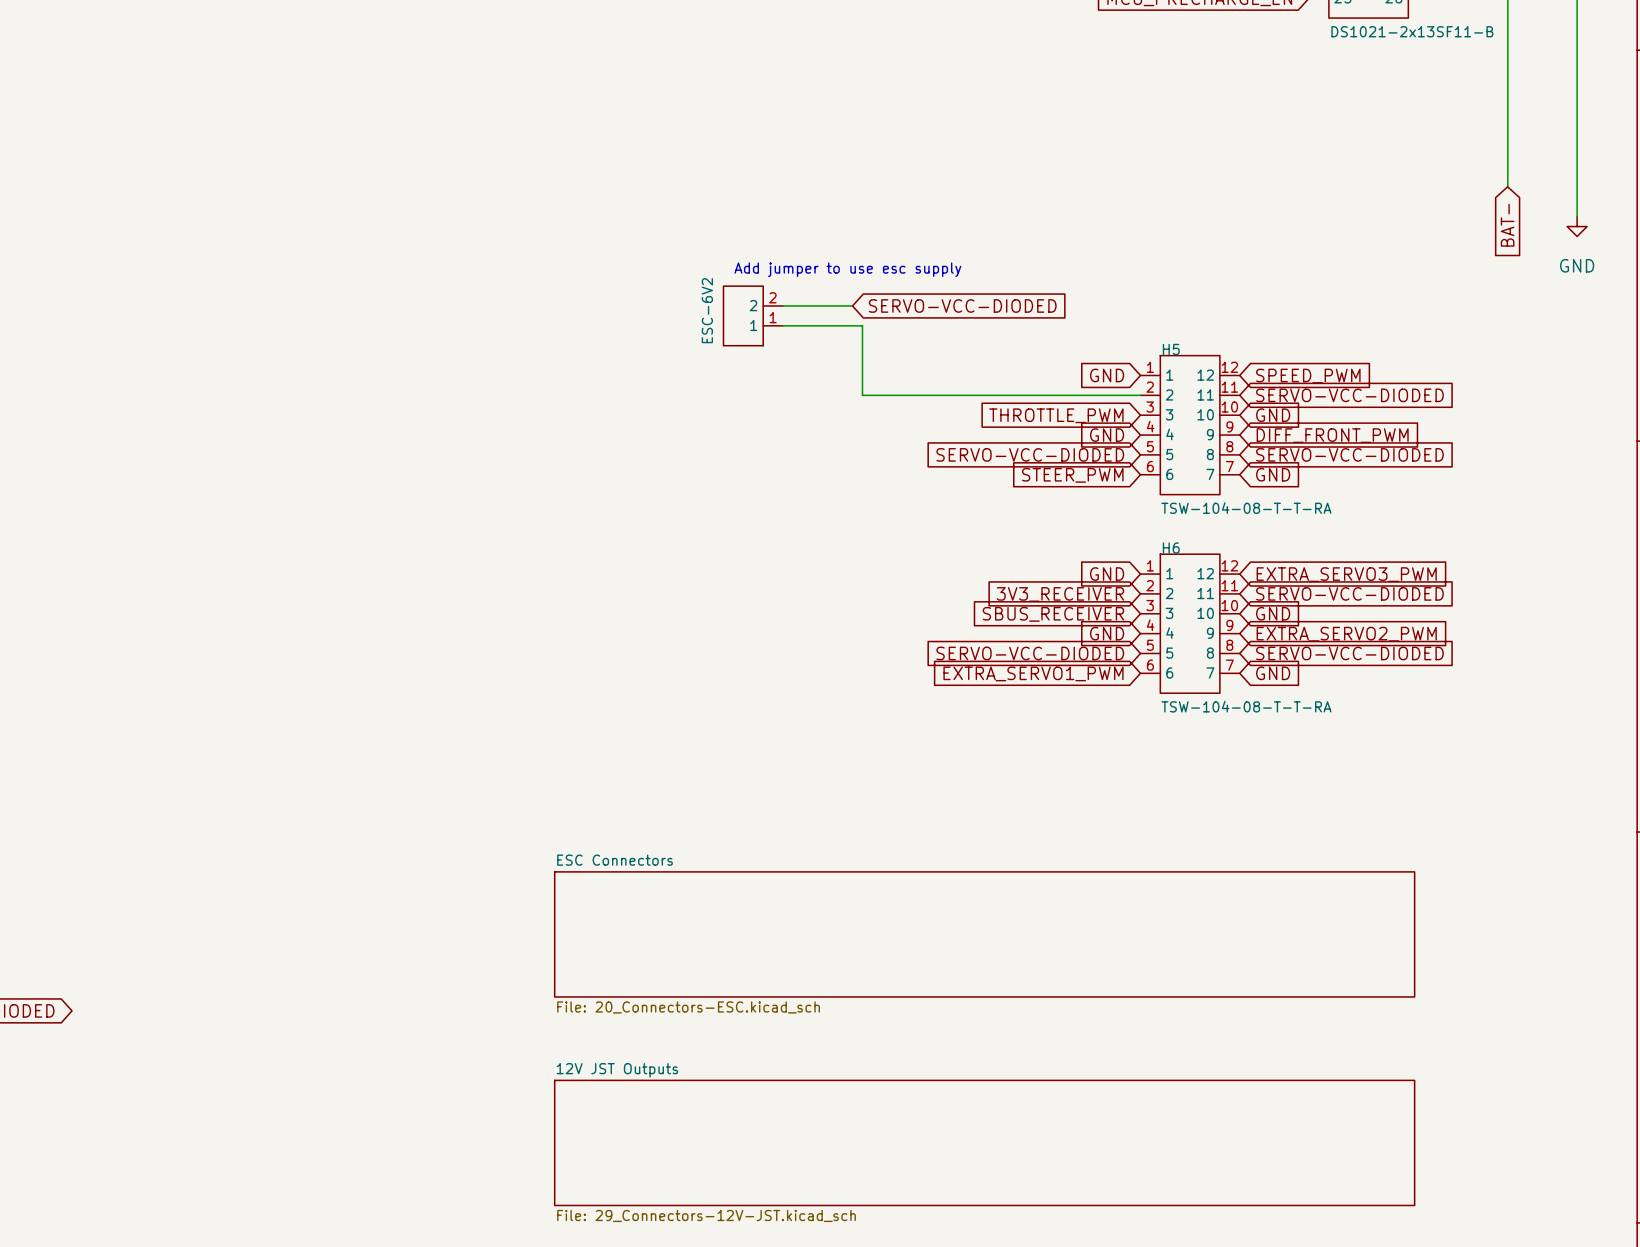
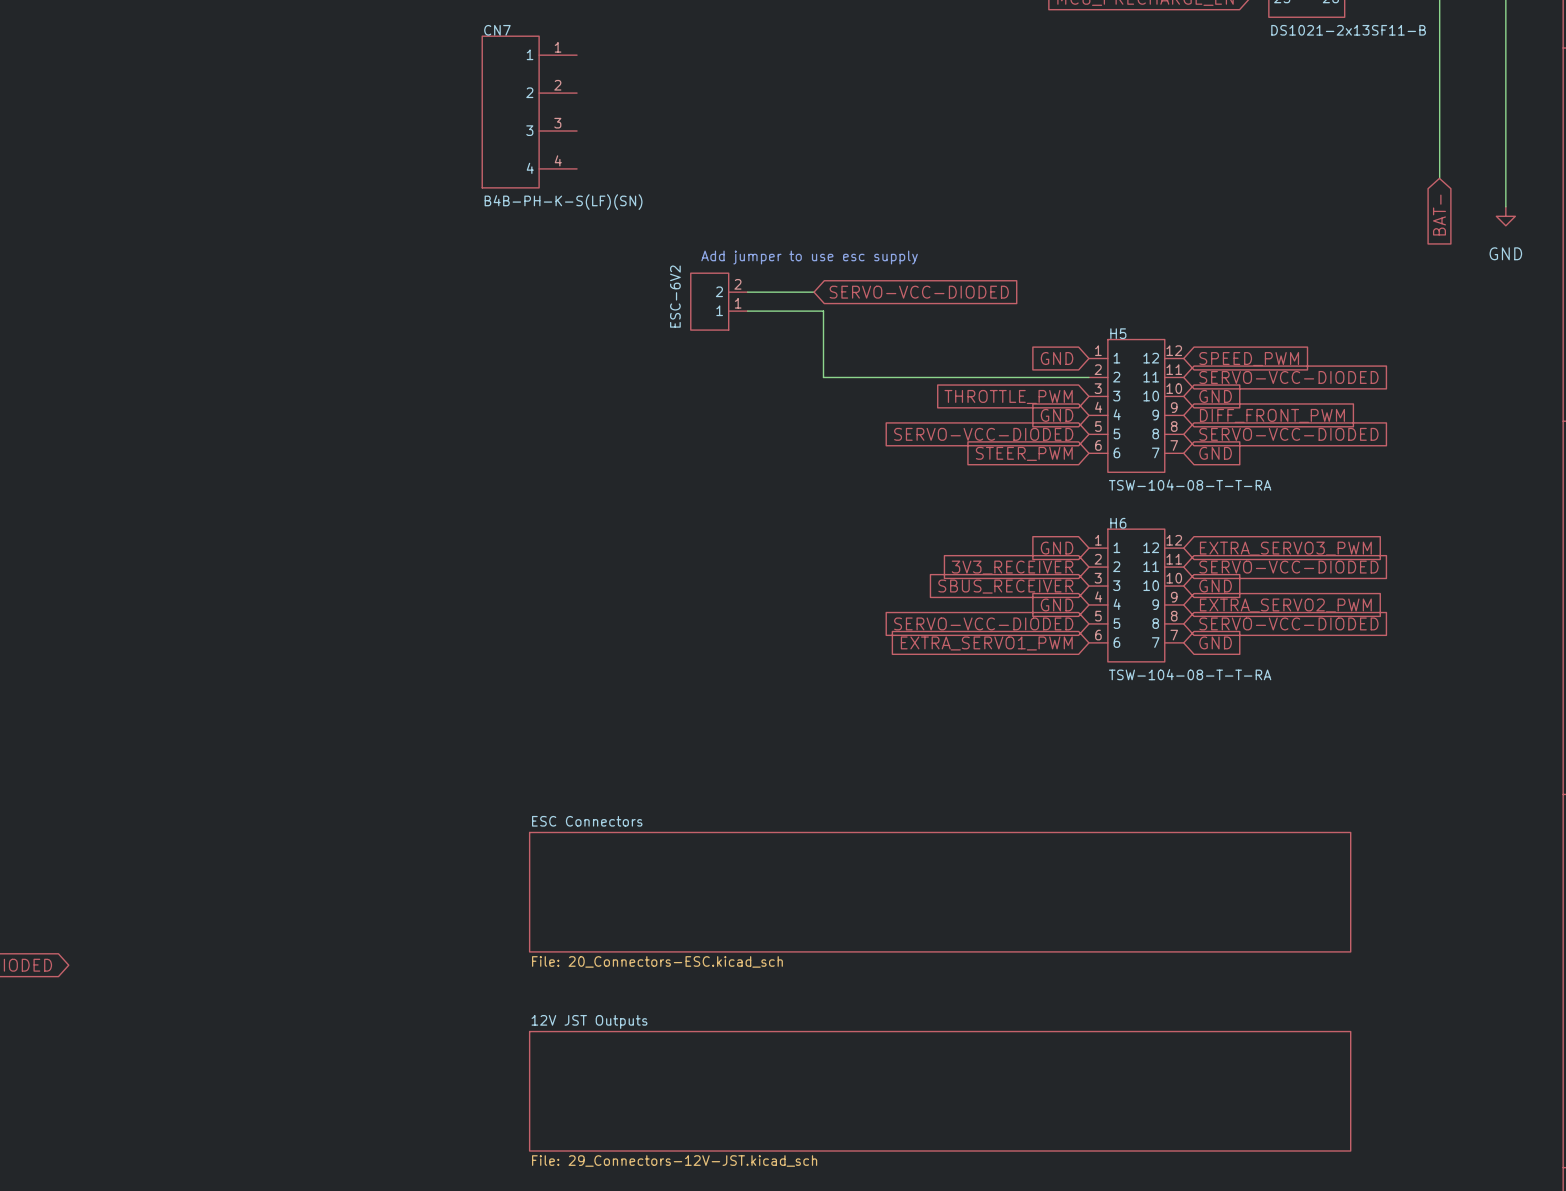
CN7: none -> B4B-PH-K-S(LF)(SN) (529, 112)

